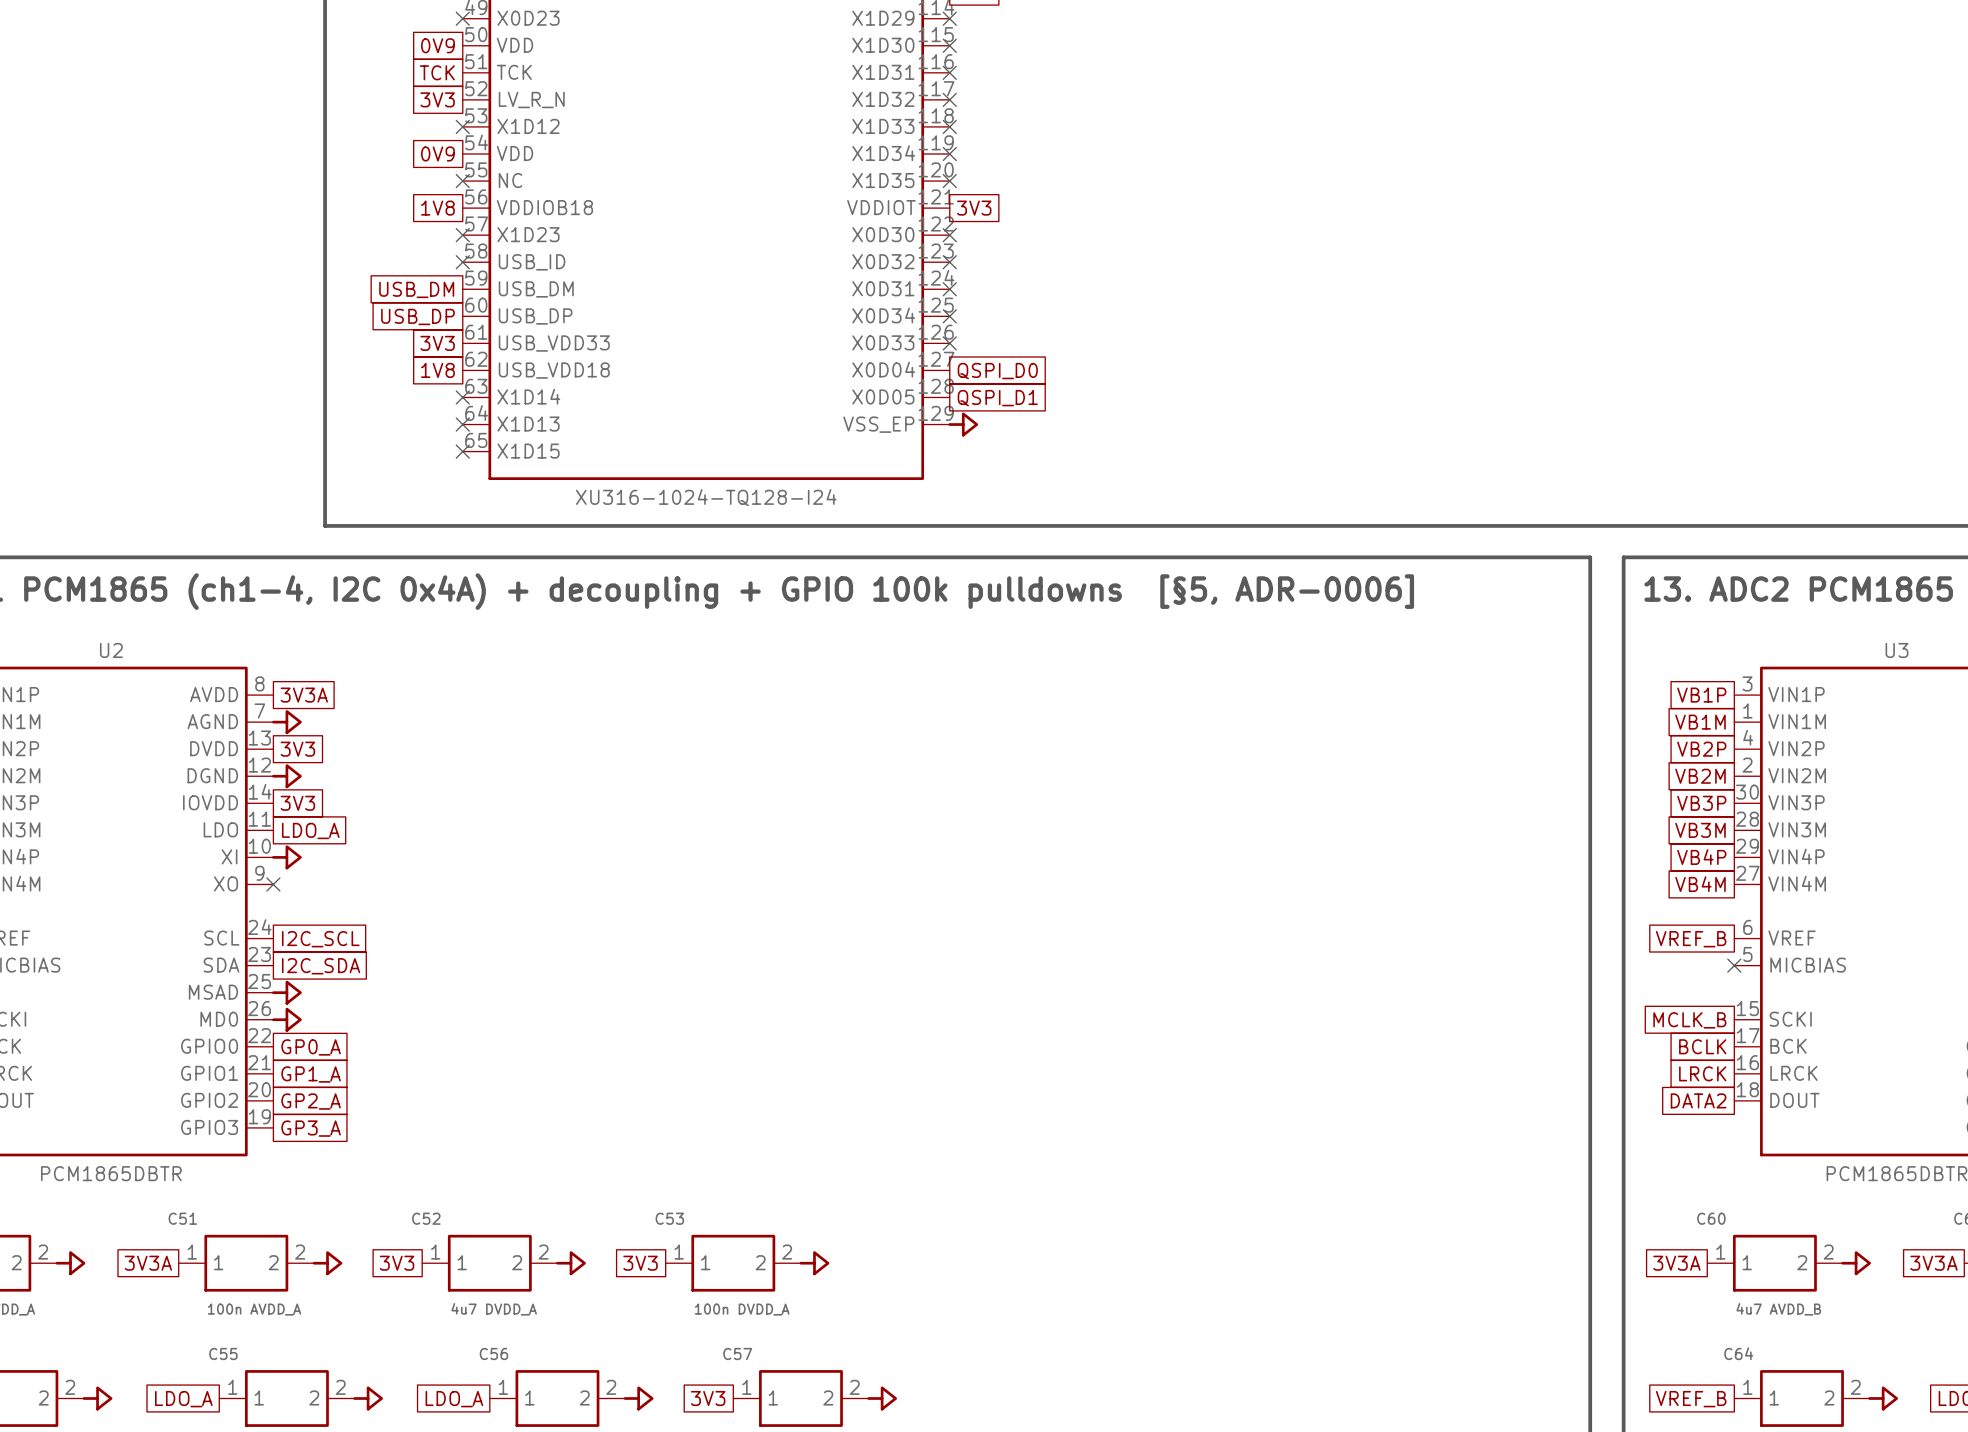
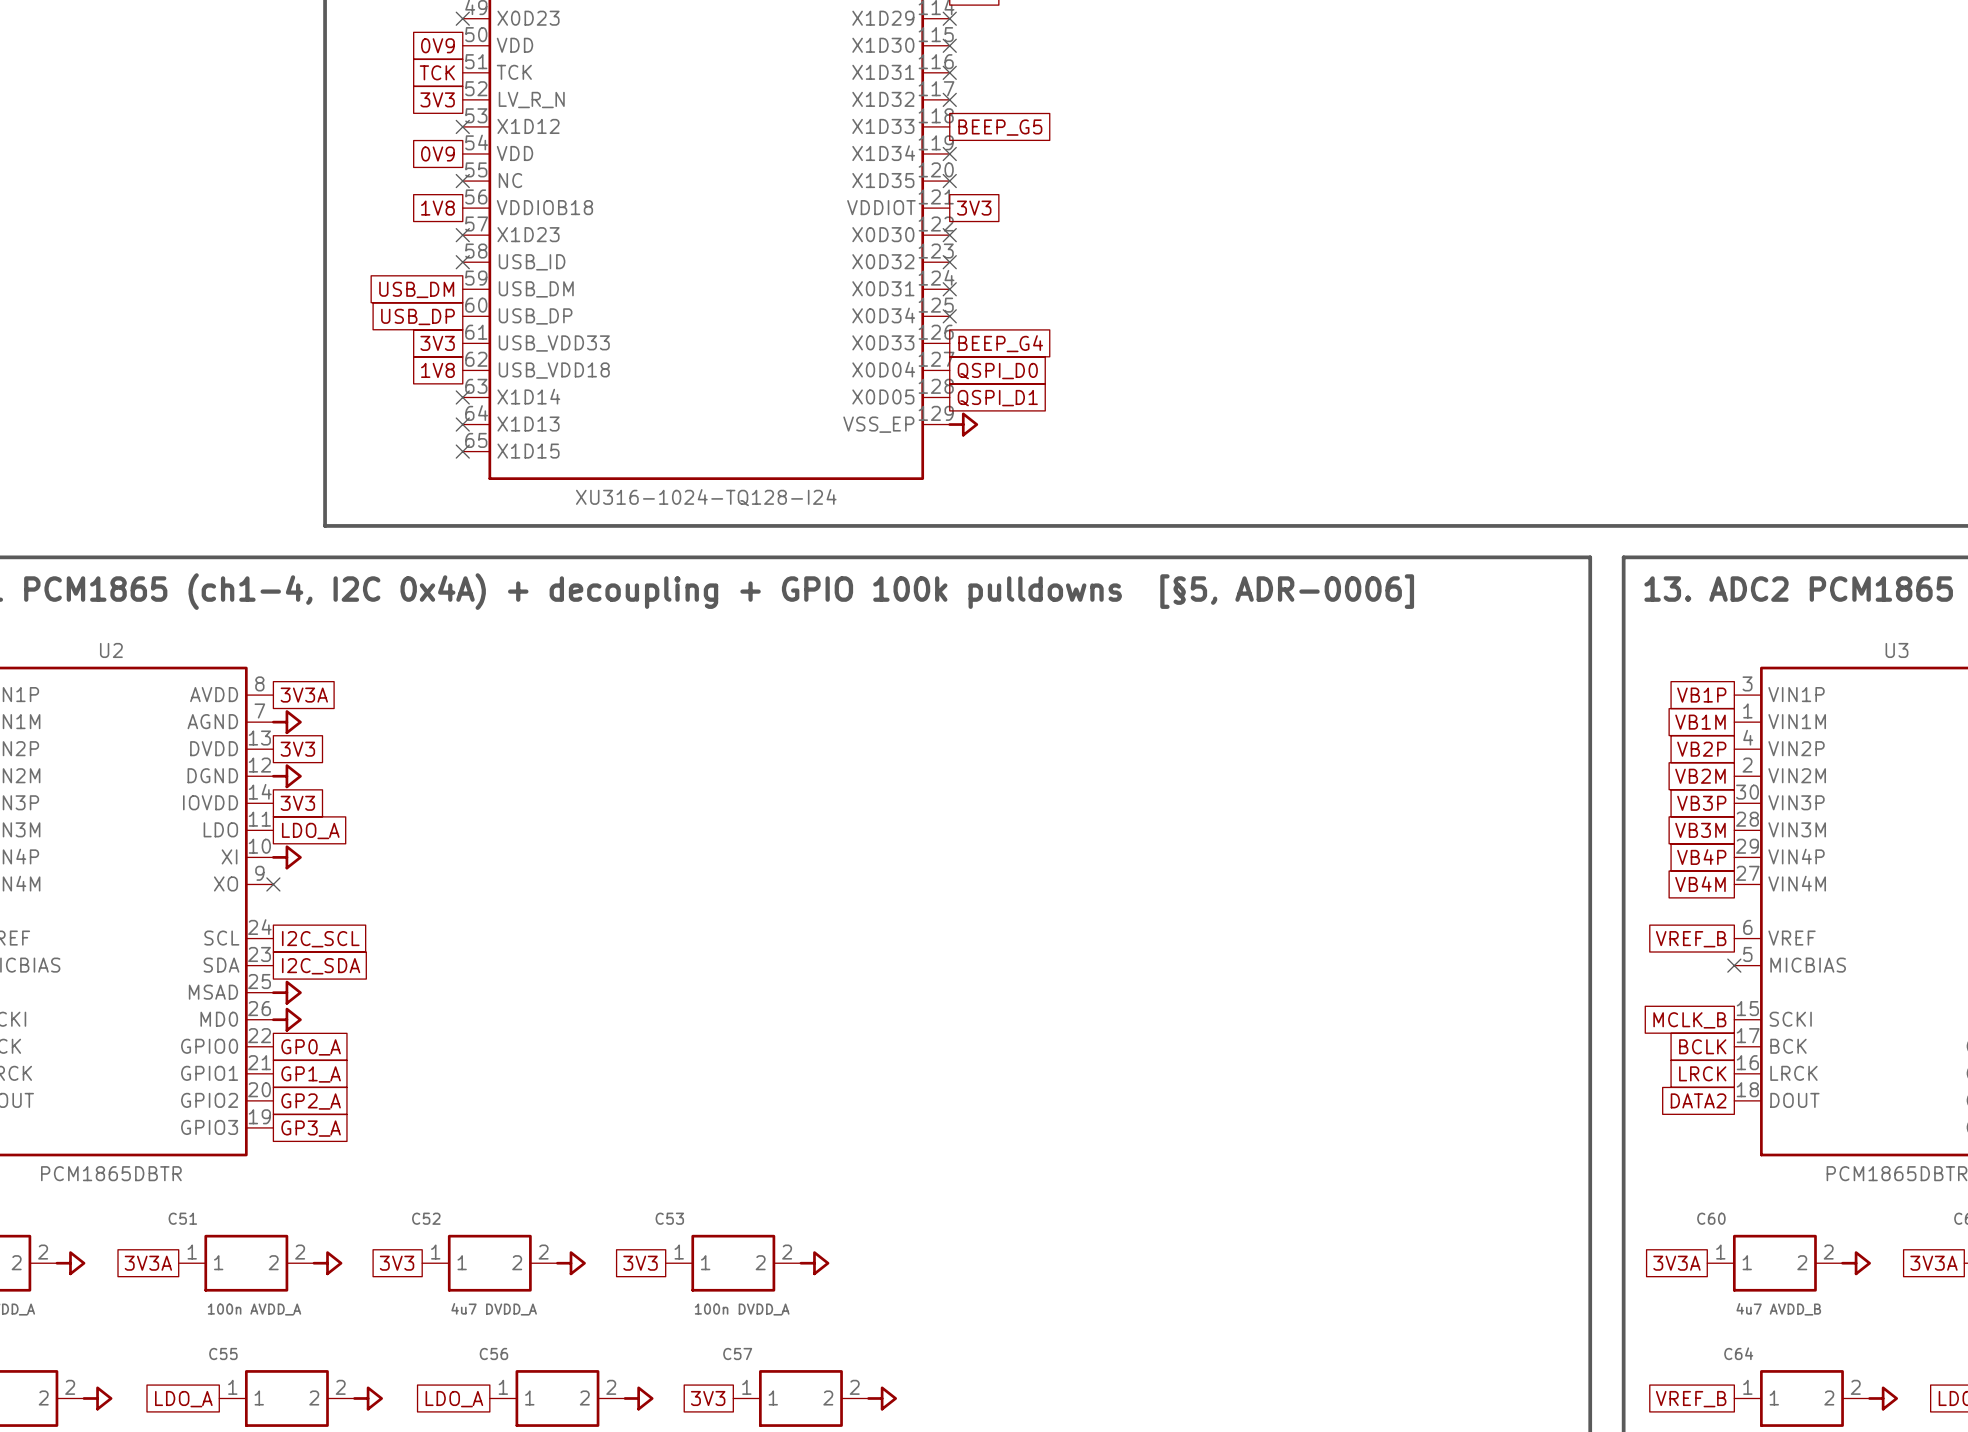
no-connect mark: (949, 126) -> none
global label: none -> BEEP_G5 (1000, 127)
no-connect mark: (949, 343) -> none
global label: none -> BEEP_G4 (1000, 343)

